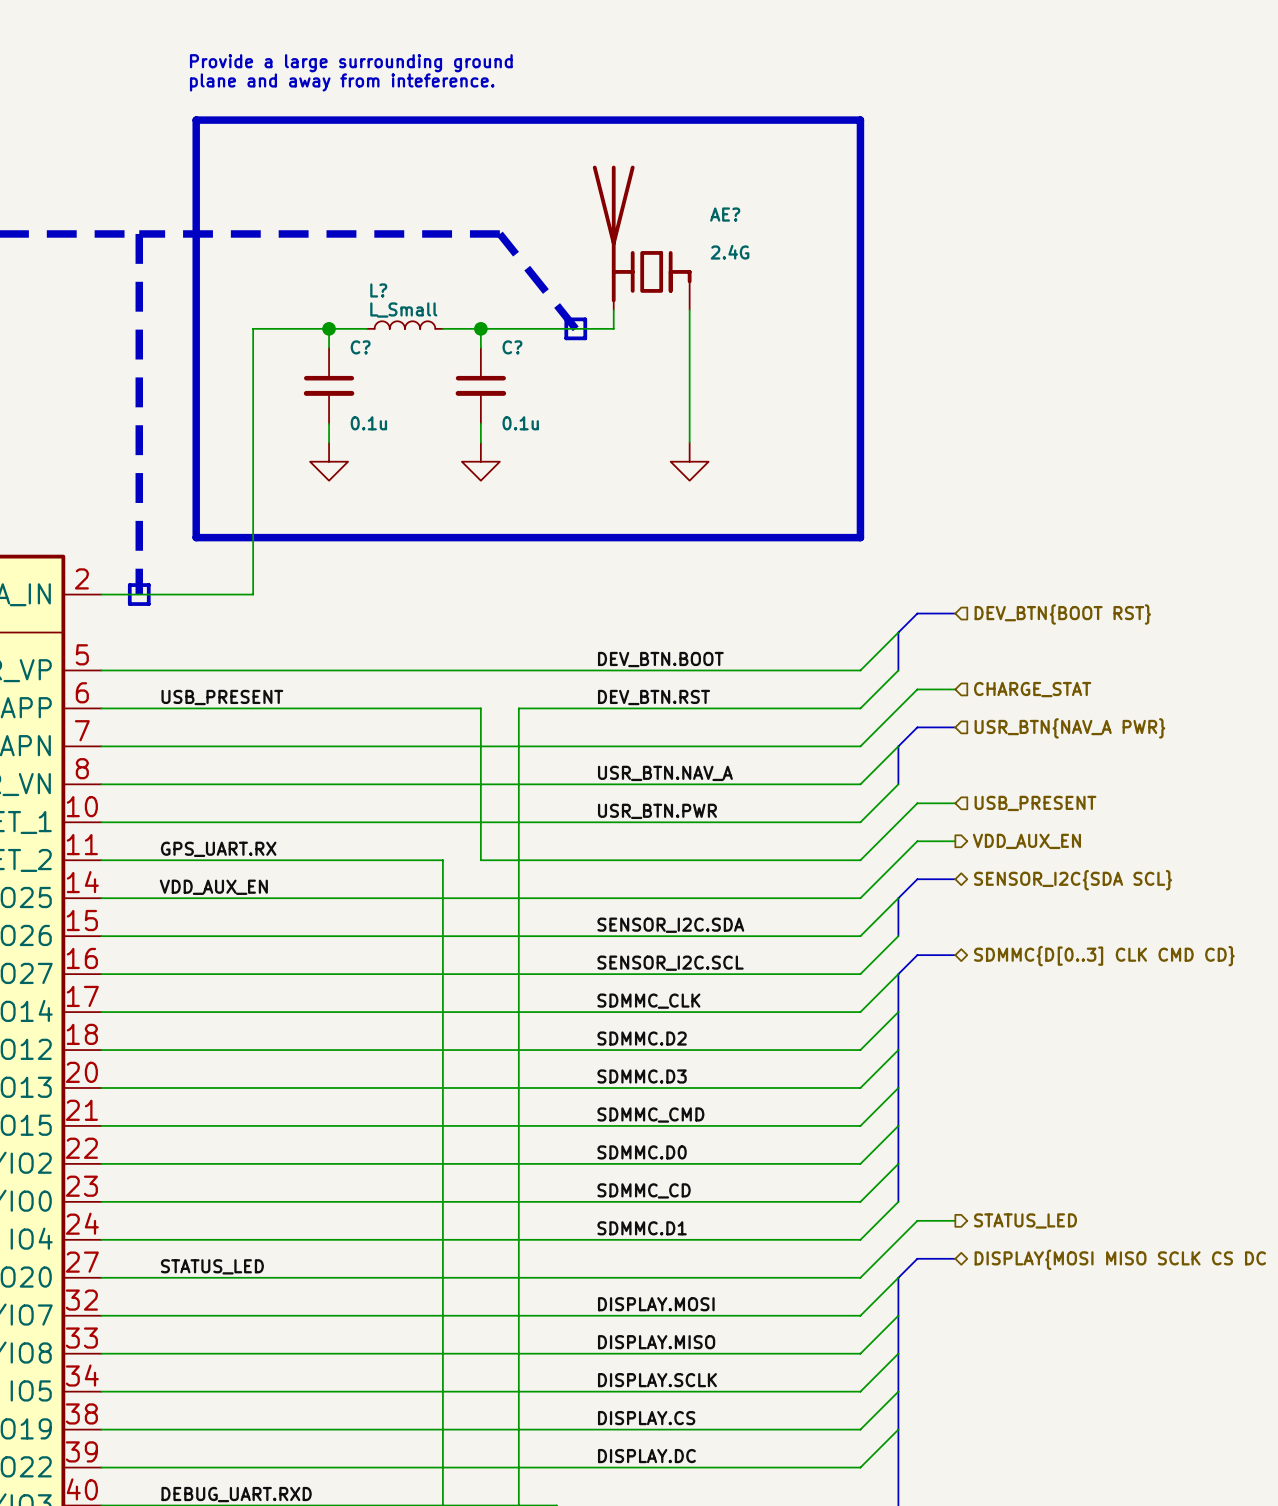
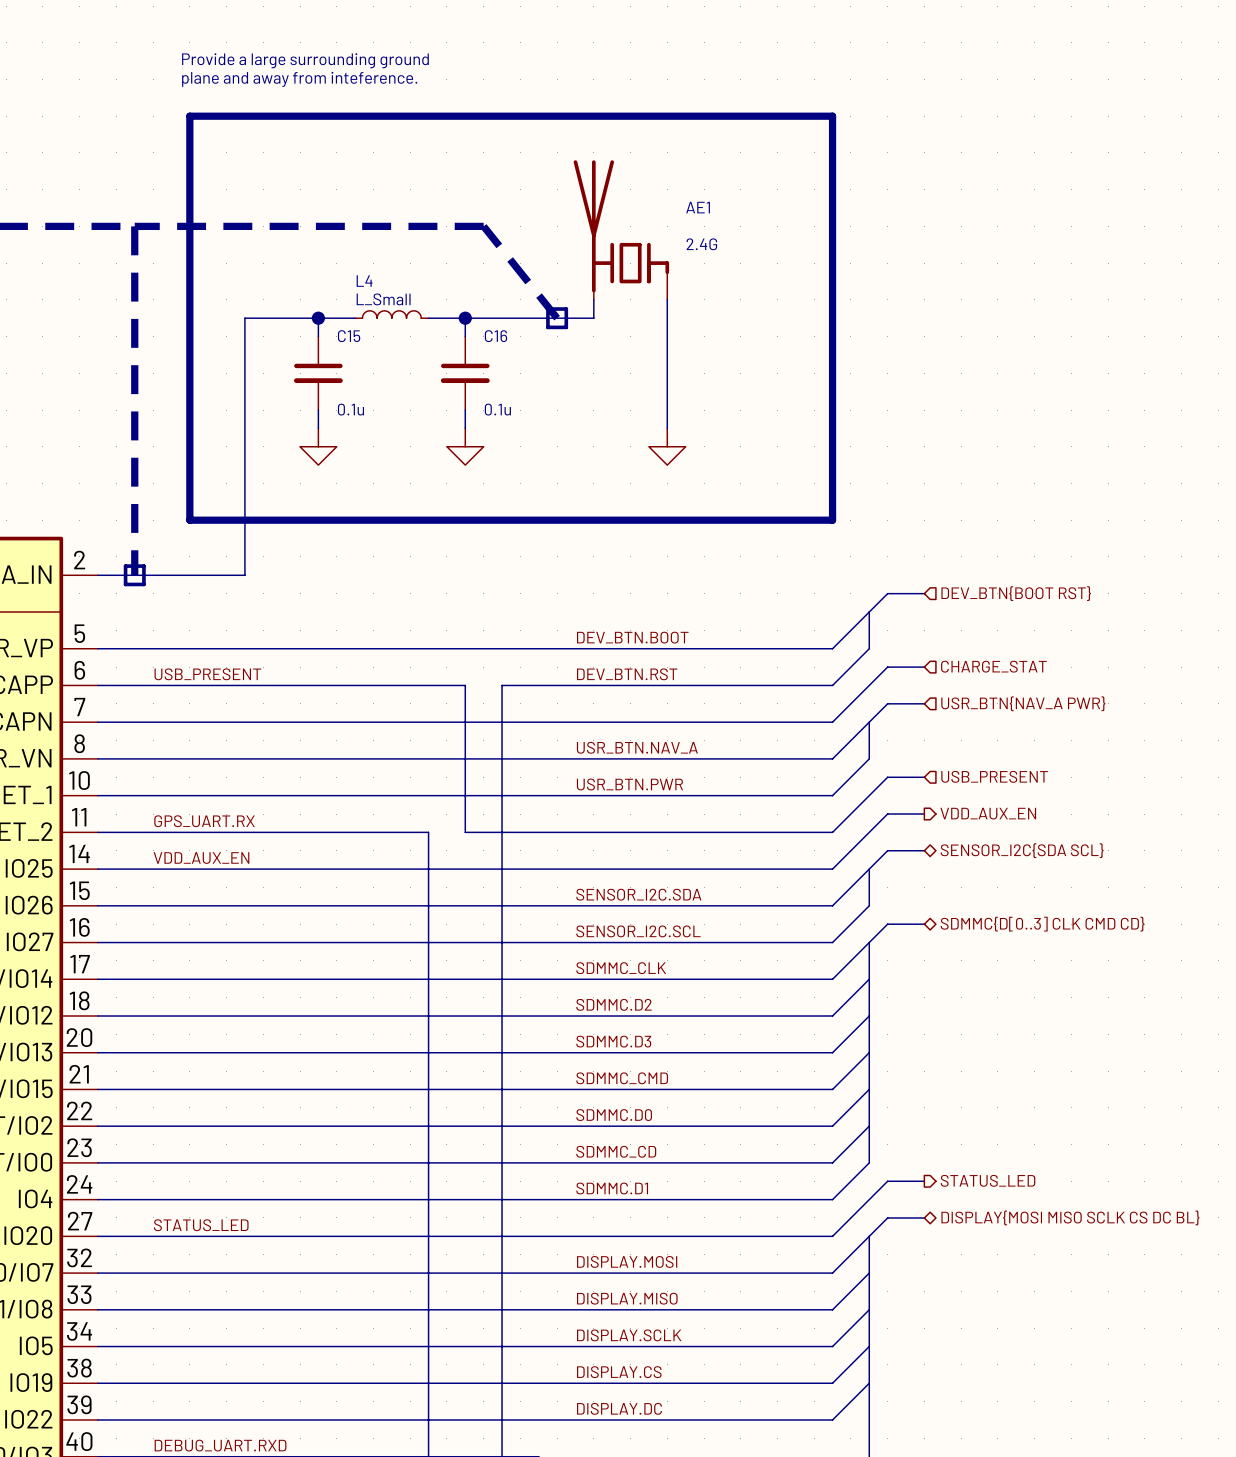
AE? name: AE? (725, 214) -> AE1 (698, 207)
L? name: L? (378, 290) -> L4 (364, 281)
C? name: C? (360, 347) -> C15 (349, 336)
C? name: C? (512, 347) -> C16 (495, 336)

